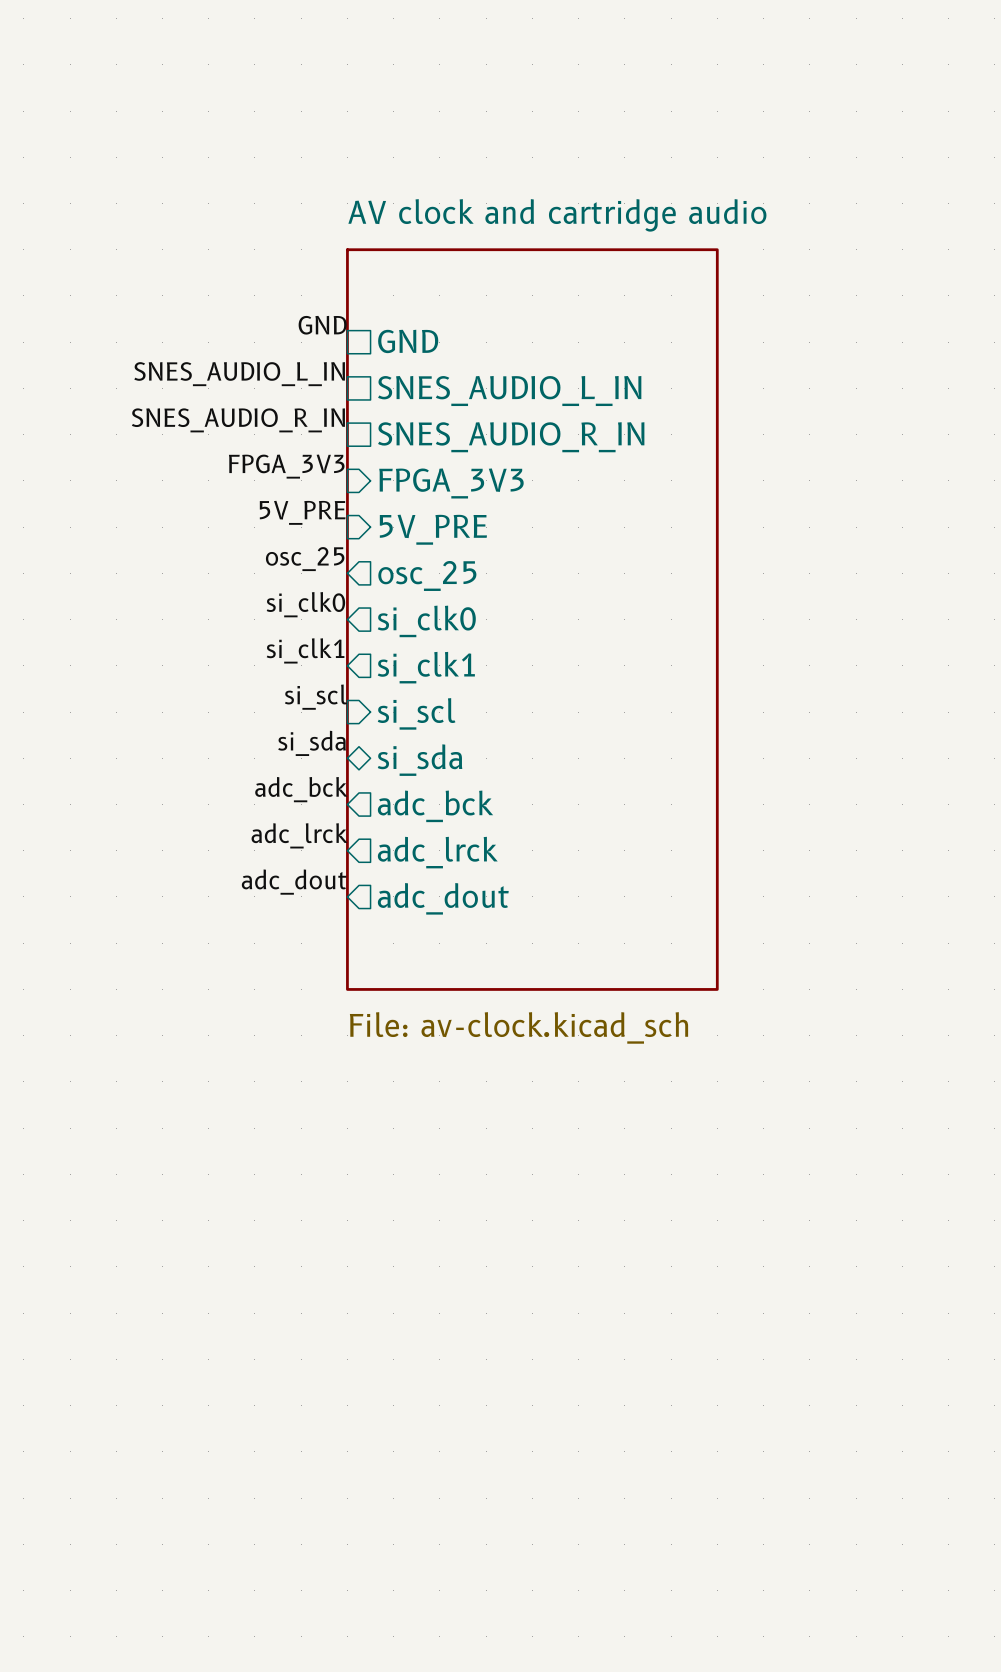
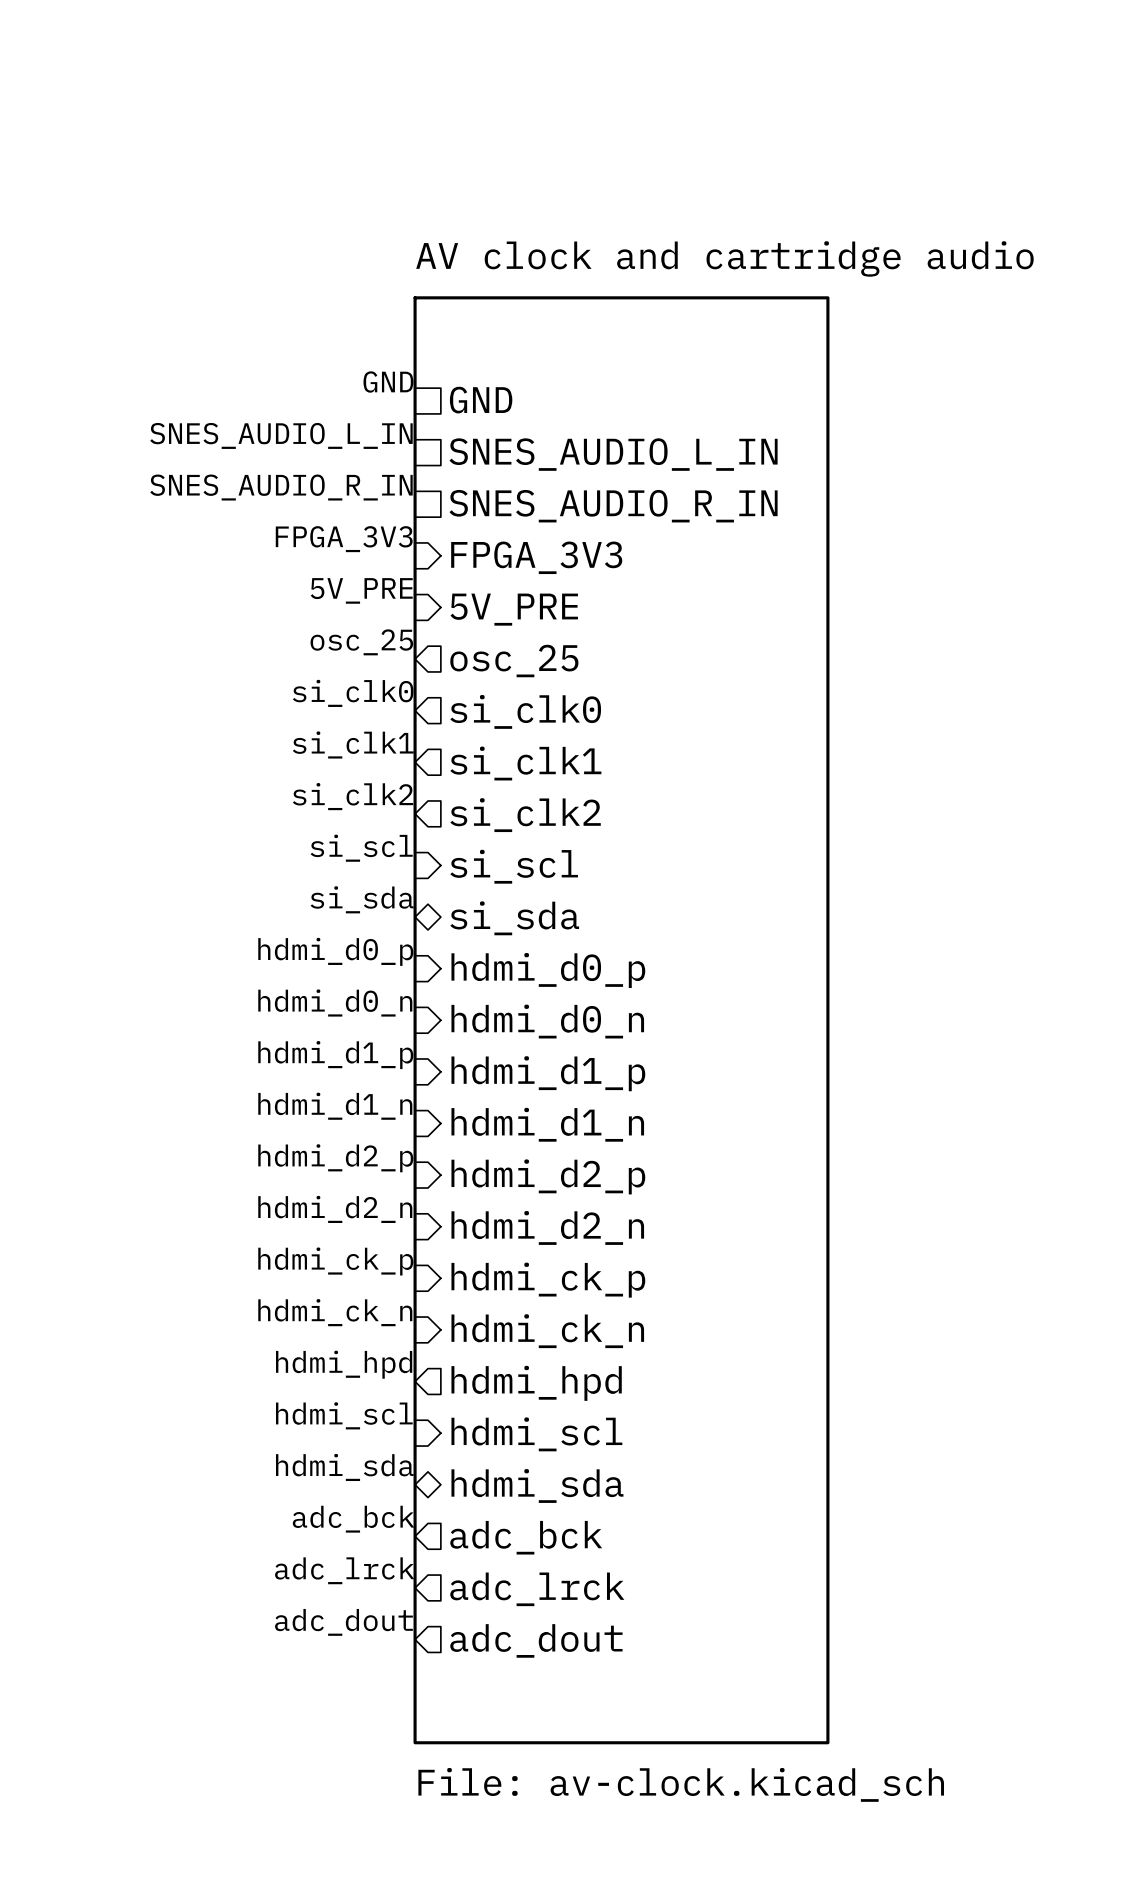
sheet AV clock and cartridge audio: File: av-clock.kicad_sch (532, 619) -> none
label: si_scl (316, 697) -> si_clk2 (353, 796)
sheet pin shape: input (416, 713) -> output (525, 815)
sheet pin: si_scl (416, 713) -> si_clk2 (525, 815)
label: si_sda (312, 743) -> si_scl (361, 848)
sheet pin shape: bidirectional (420, 760) -> input (514, 866)
sheet pin: si_sda (420, 760) -> si_scl (514, 866)
label: adc_bck (301, 789) -> si_sda (362, 899)
sheet pin shape: output (435, 806) -> bidirectional (514, 918)
sheet pin: adc_bck (435, 806) -> si_sda (514, 918)
label: adc_lrck (299, 835) -> hdmi_d0_p (335, 951)
sheet pin shape: output (437, 852) -> input (548, 970)
sheet pin: adc_lrck (437, 852) -> hdmi_d0_p (548, 970)
label: adc_dout (294, 882) -> hdmi_d0_n (335, 1003)
sheet AV clock and cartridge audio: none -> File: av-clock.kicad_sch (621, 1020)
sheet pin shape: output (443, 898) -> input (547, 1021)
sheet pin: adc_dout (443, 898) -> hdmi_d0_n (547, 1021)
label: none -> hdmi_d1_p (335, 1055)
sheet pin: none -> hdmi_d1_p (548, 1073)
label: none -> hdmi_d1_n (335, 1106)
sheet pin: none -> hdmi_d1_n (547, 1124)
label: none -> hdmi_d2_p (335, 1158)
sheet pin: none -> hdmi_d2_p (548, 1176)
label: none -> hdmi_d2_n (335, 1209)
sheet pin: none -> hdmi_d2_n (547, 1227)
label: none -> hdmi_ck_p (335, 1261)
sheet pin: none -> hdmi_ck_p (548, 1280)
label: none -> hdmi_ck_n (335, 1312)
sheet pin: none -> hdmi_ck_n (547, 1331)
label: none -> hdmi_hpd (344, 1364)
sheet pin: none -> hdmi_hpd (536, 1383)
label: none -> hdmi_scl (344, 1415)
sheet pin: none -> hdmi_scl (536, 1434)
label: none -> hdmi_sda (344, 1467)
sheet pin: none -> hdmi_sda (537, 1485)
label: none -> adc_bck (353, 1519)
sheet pin: none -> adc_bck (526, 1537)
label: none -> adc_lrck (344, 1570)
sheet pin: none -> adc_lrck (537, 1589)
label: none -> adc_dout (343, 1622)
sheet pin: none -> adc_dout (536, 1640)

